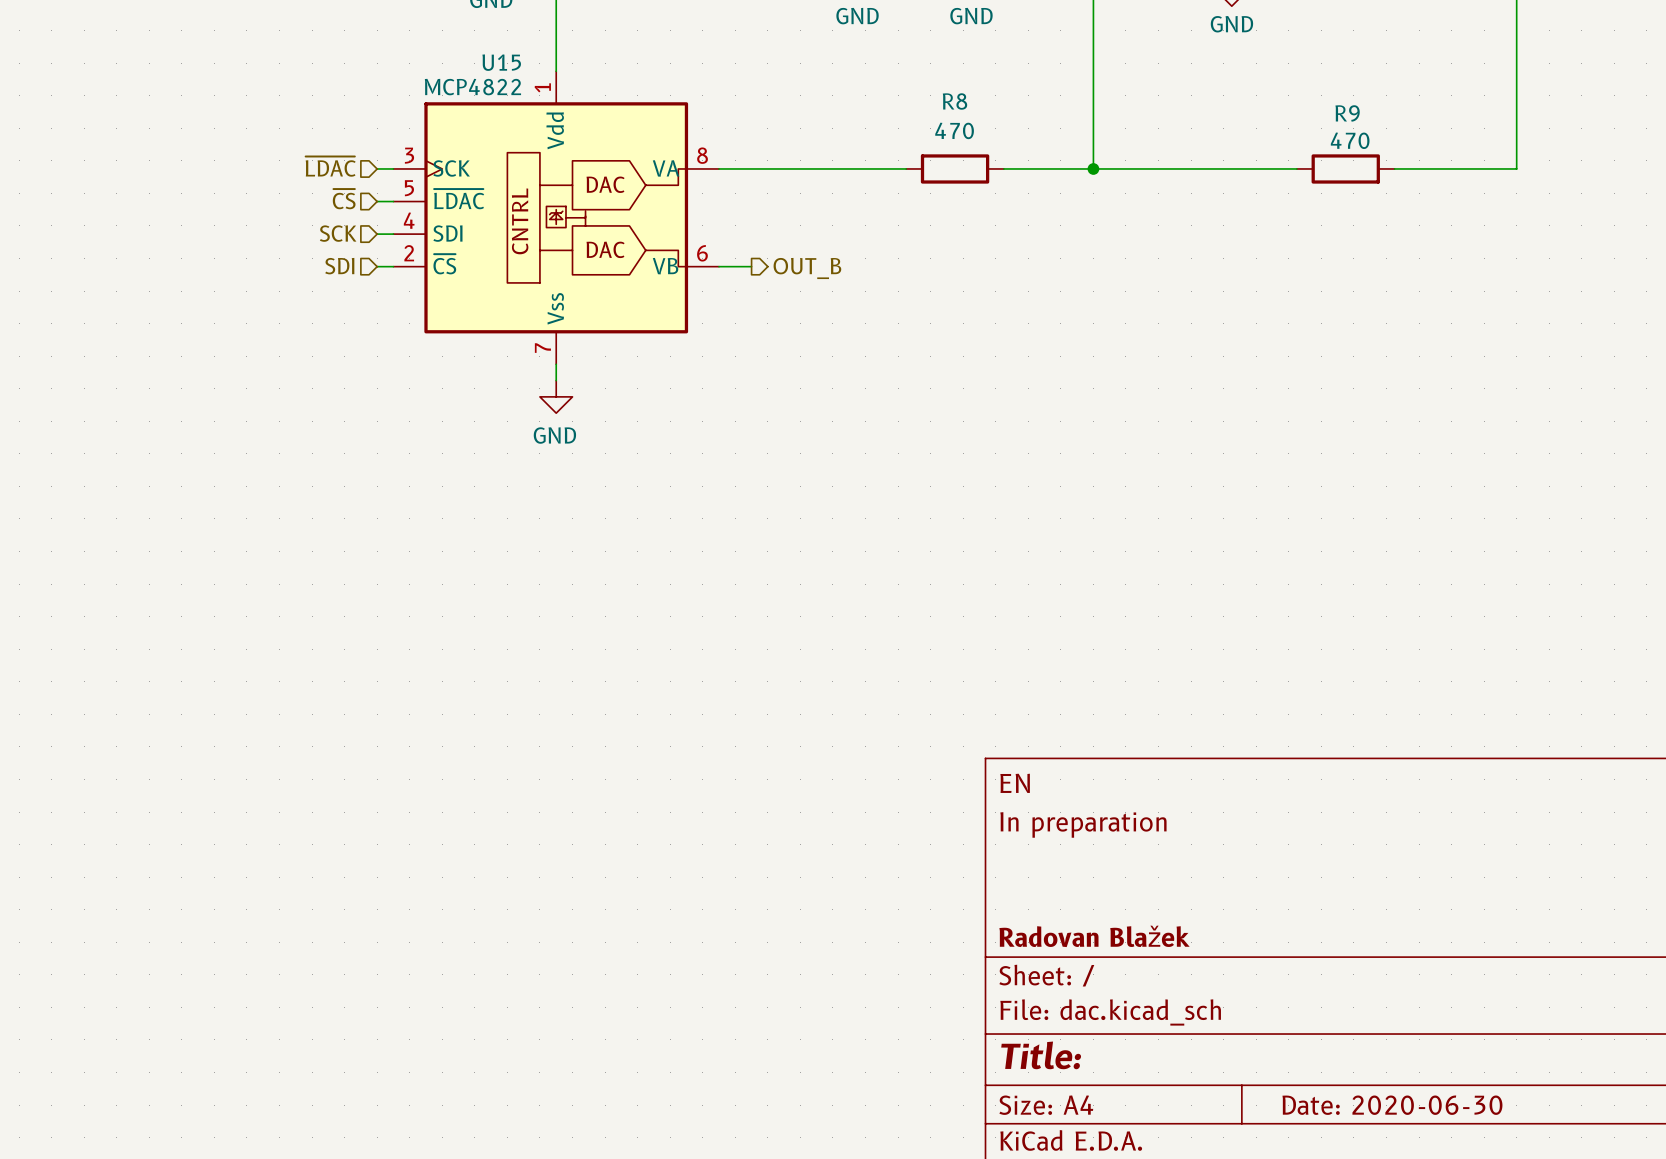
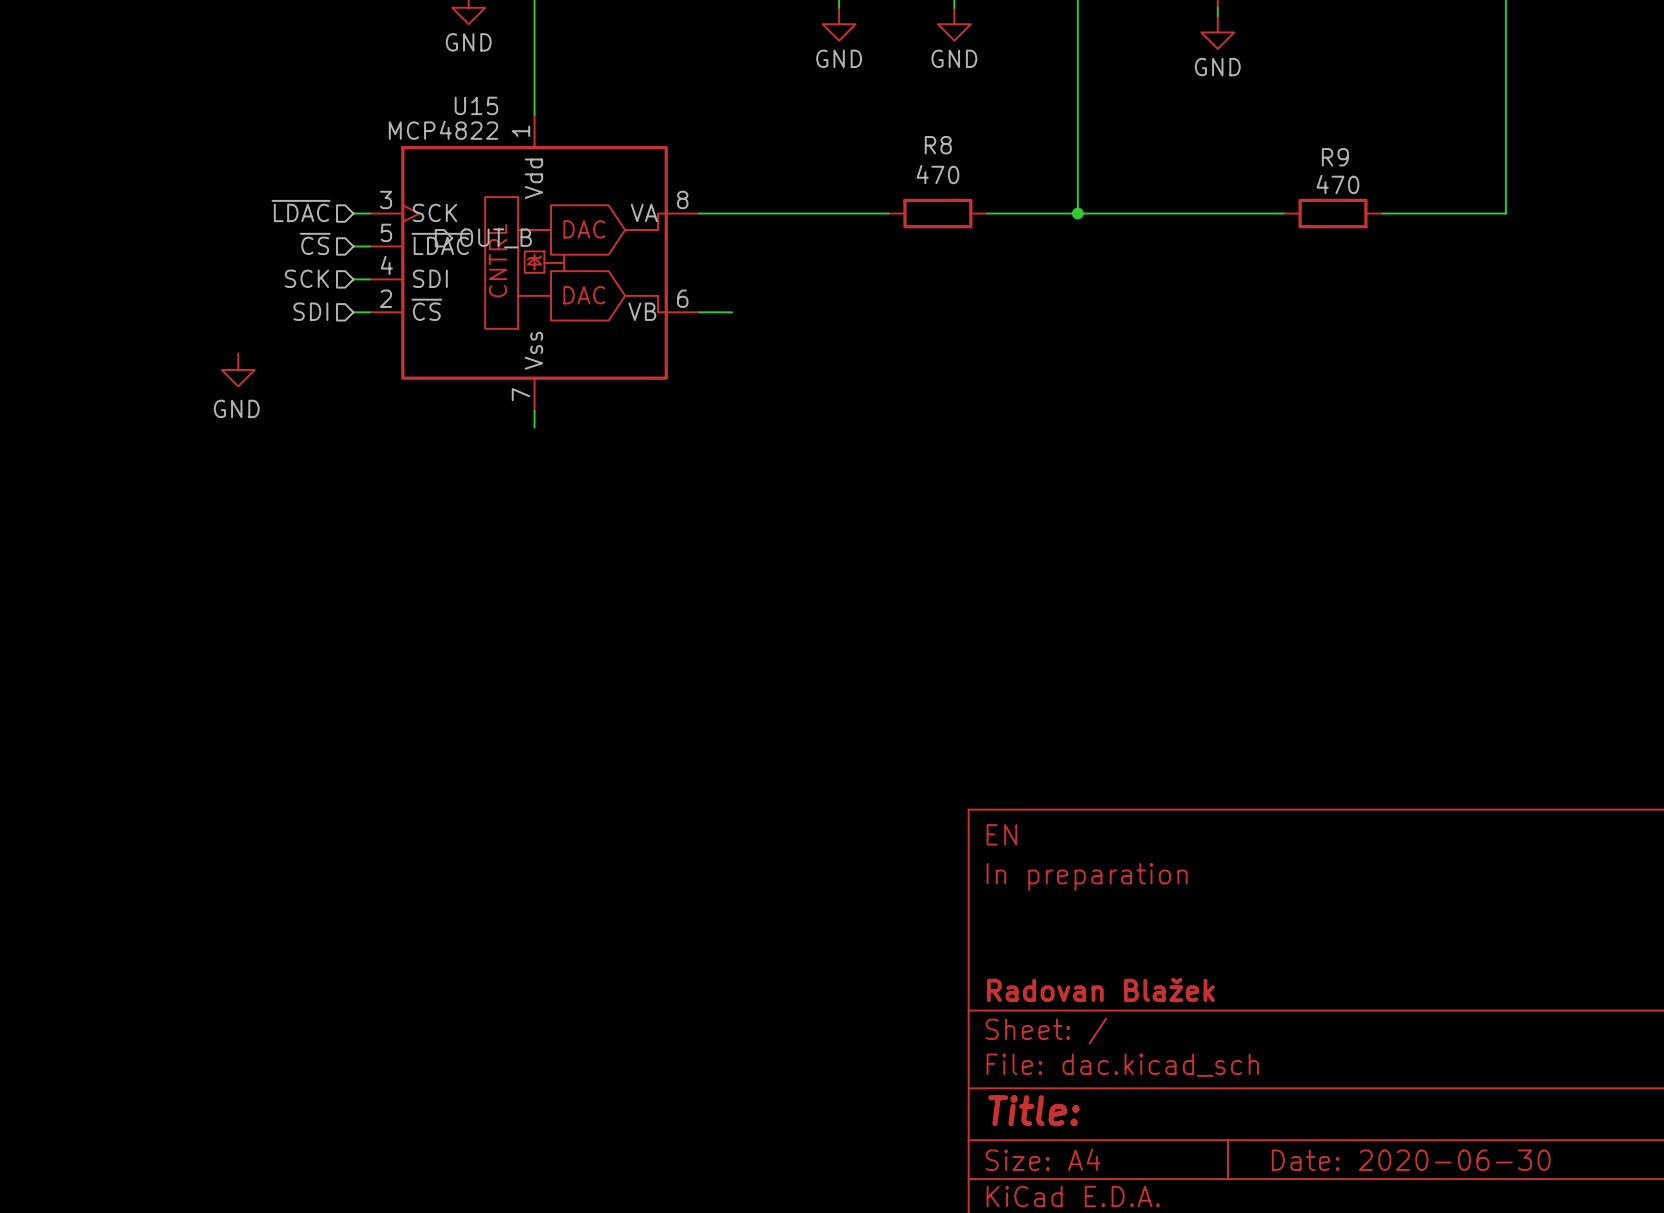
hierarchical label position: OUT_B (807, 268) -> OUT_B (496, 238)
power symbol position: GND (556, 396) -> GND (238, 369)

